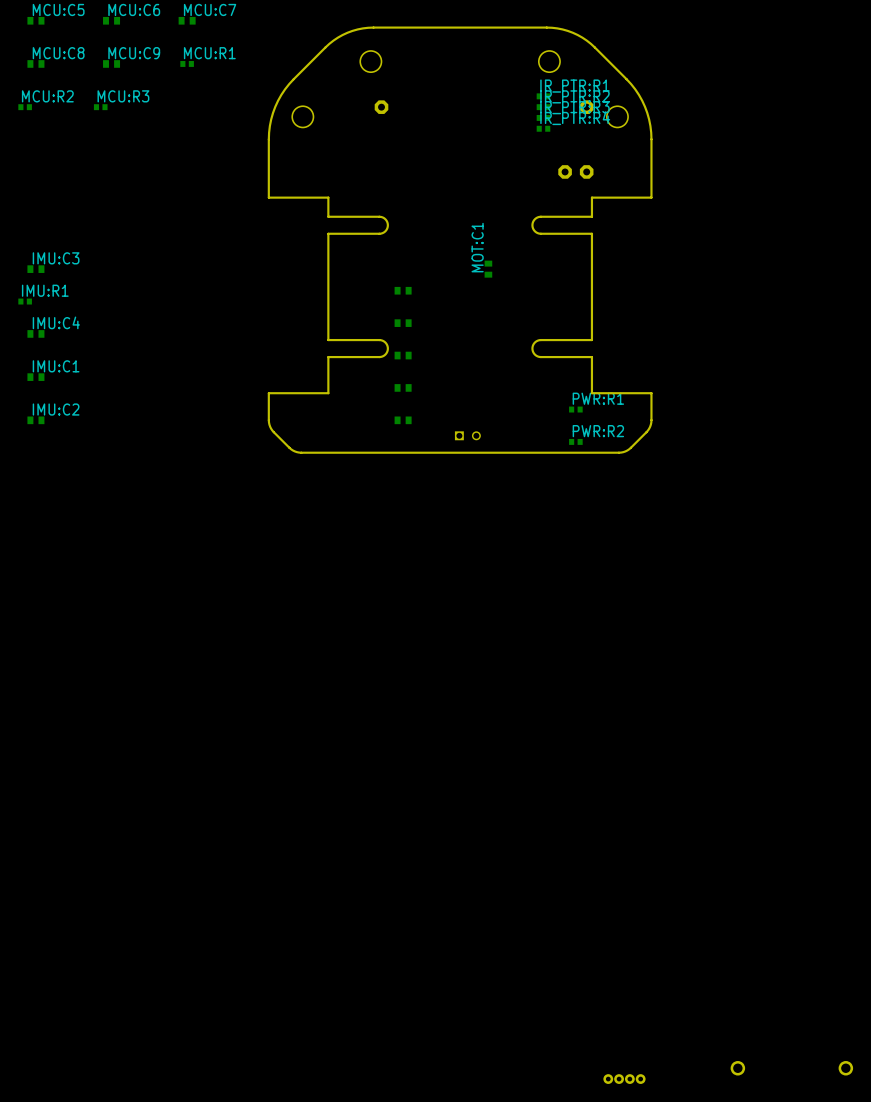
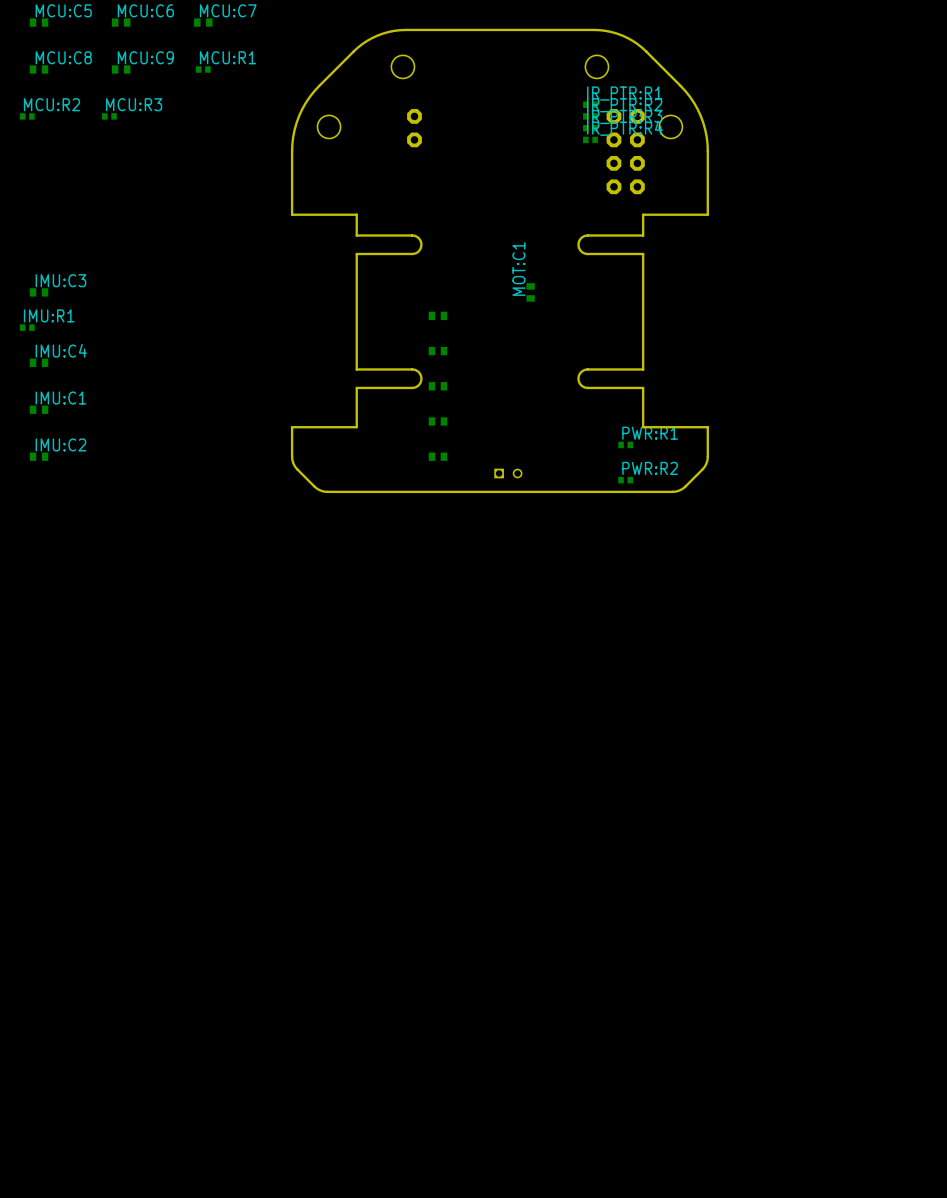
part: none -> (613, 116)
part: none -> (414, 139)
part: none -> (613, 139)
part: none -> (637, 139)
part: none -> (613, 163)
part: none -> (637, 163)
part: (737, 1068) -> none
part: (845, 1068) -> none
part: (624, 1079) -> none

